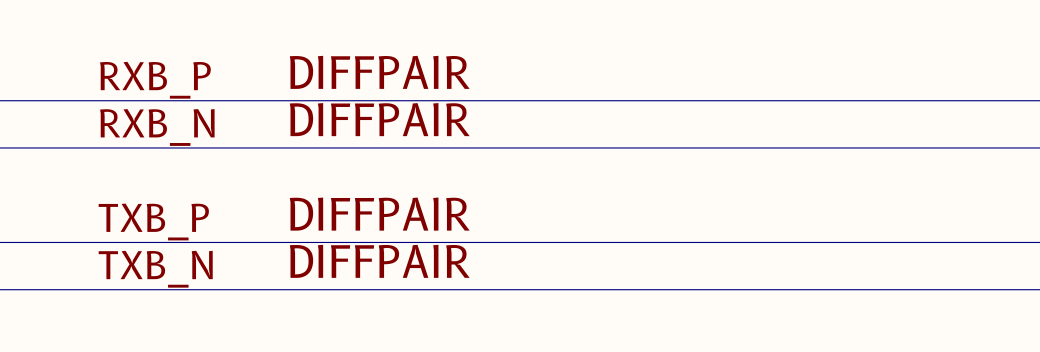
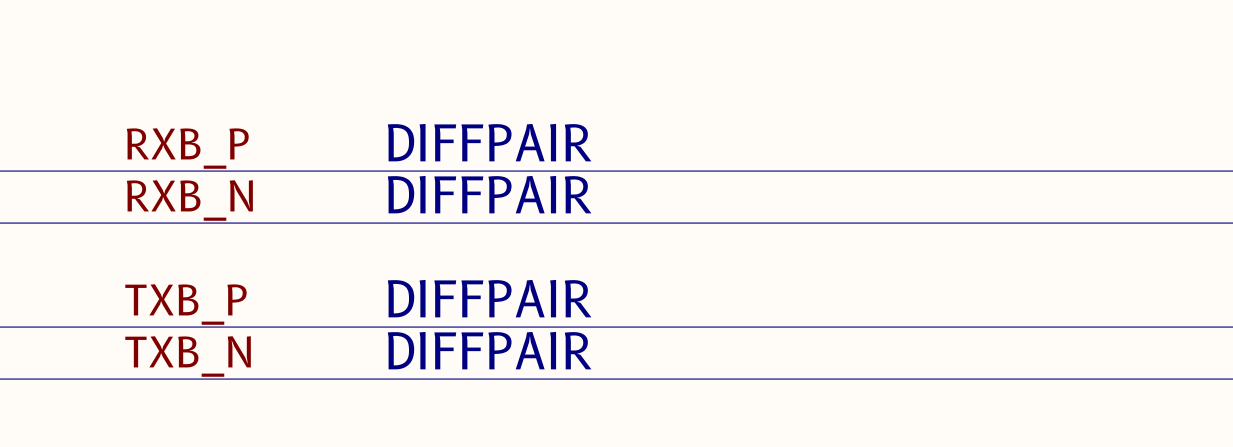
label: DIFFPAIR (379, 72) -> none
text: none -> DIFFPAIR (489, 142)
label: DIFFPAIR (379, 119) -> none
text: none -> DIFFPAIR (489, 194)
label: DIFFPAIR (379, 214) -> none
text: none -> DIFFPAIR (489, 298)
label: DIFFPAIR (379, 261) -> none
text: none -> DIFFPAIR (489, 350)

